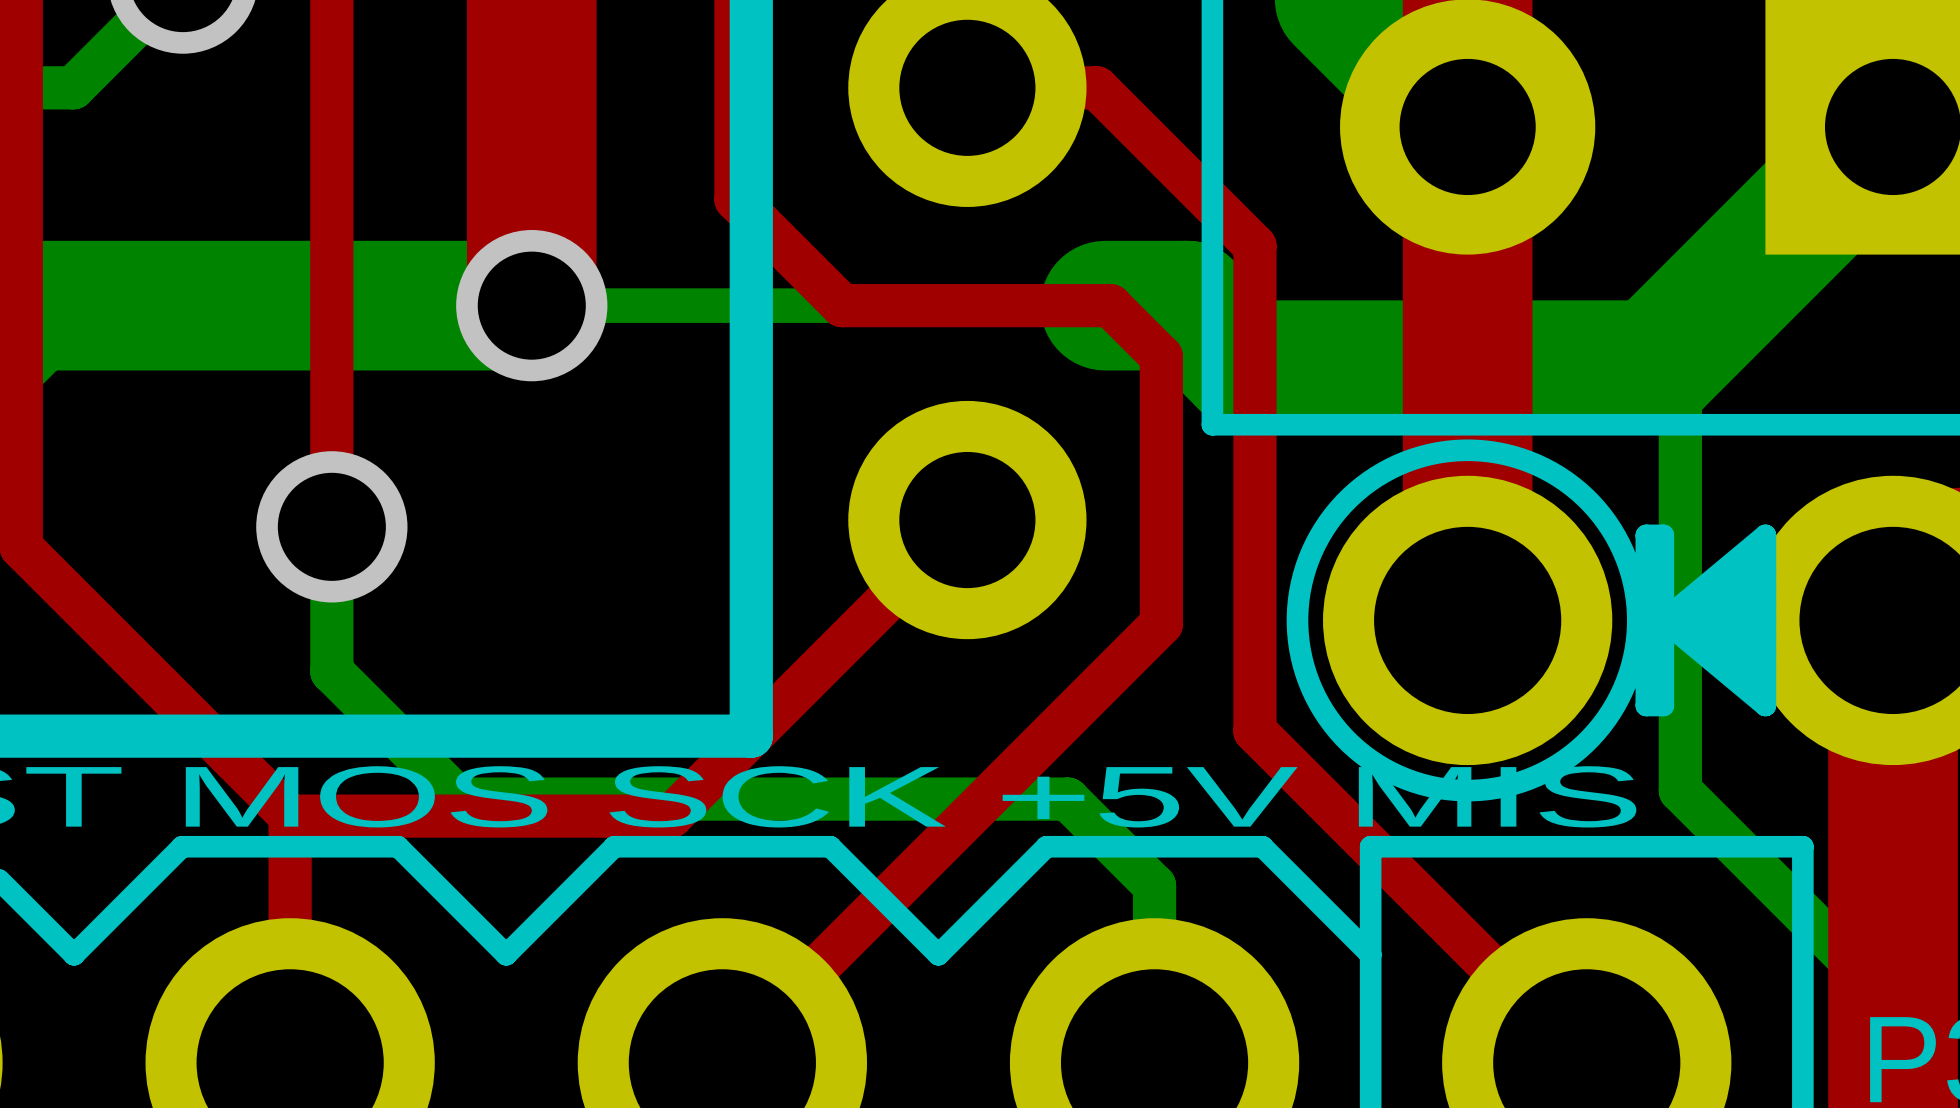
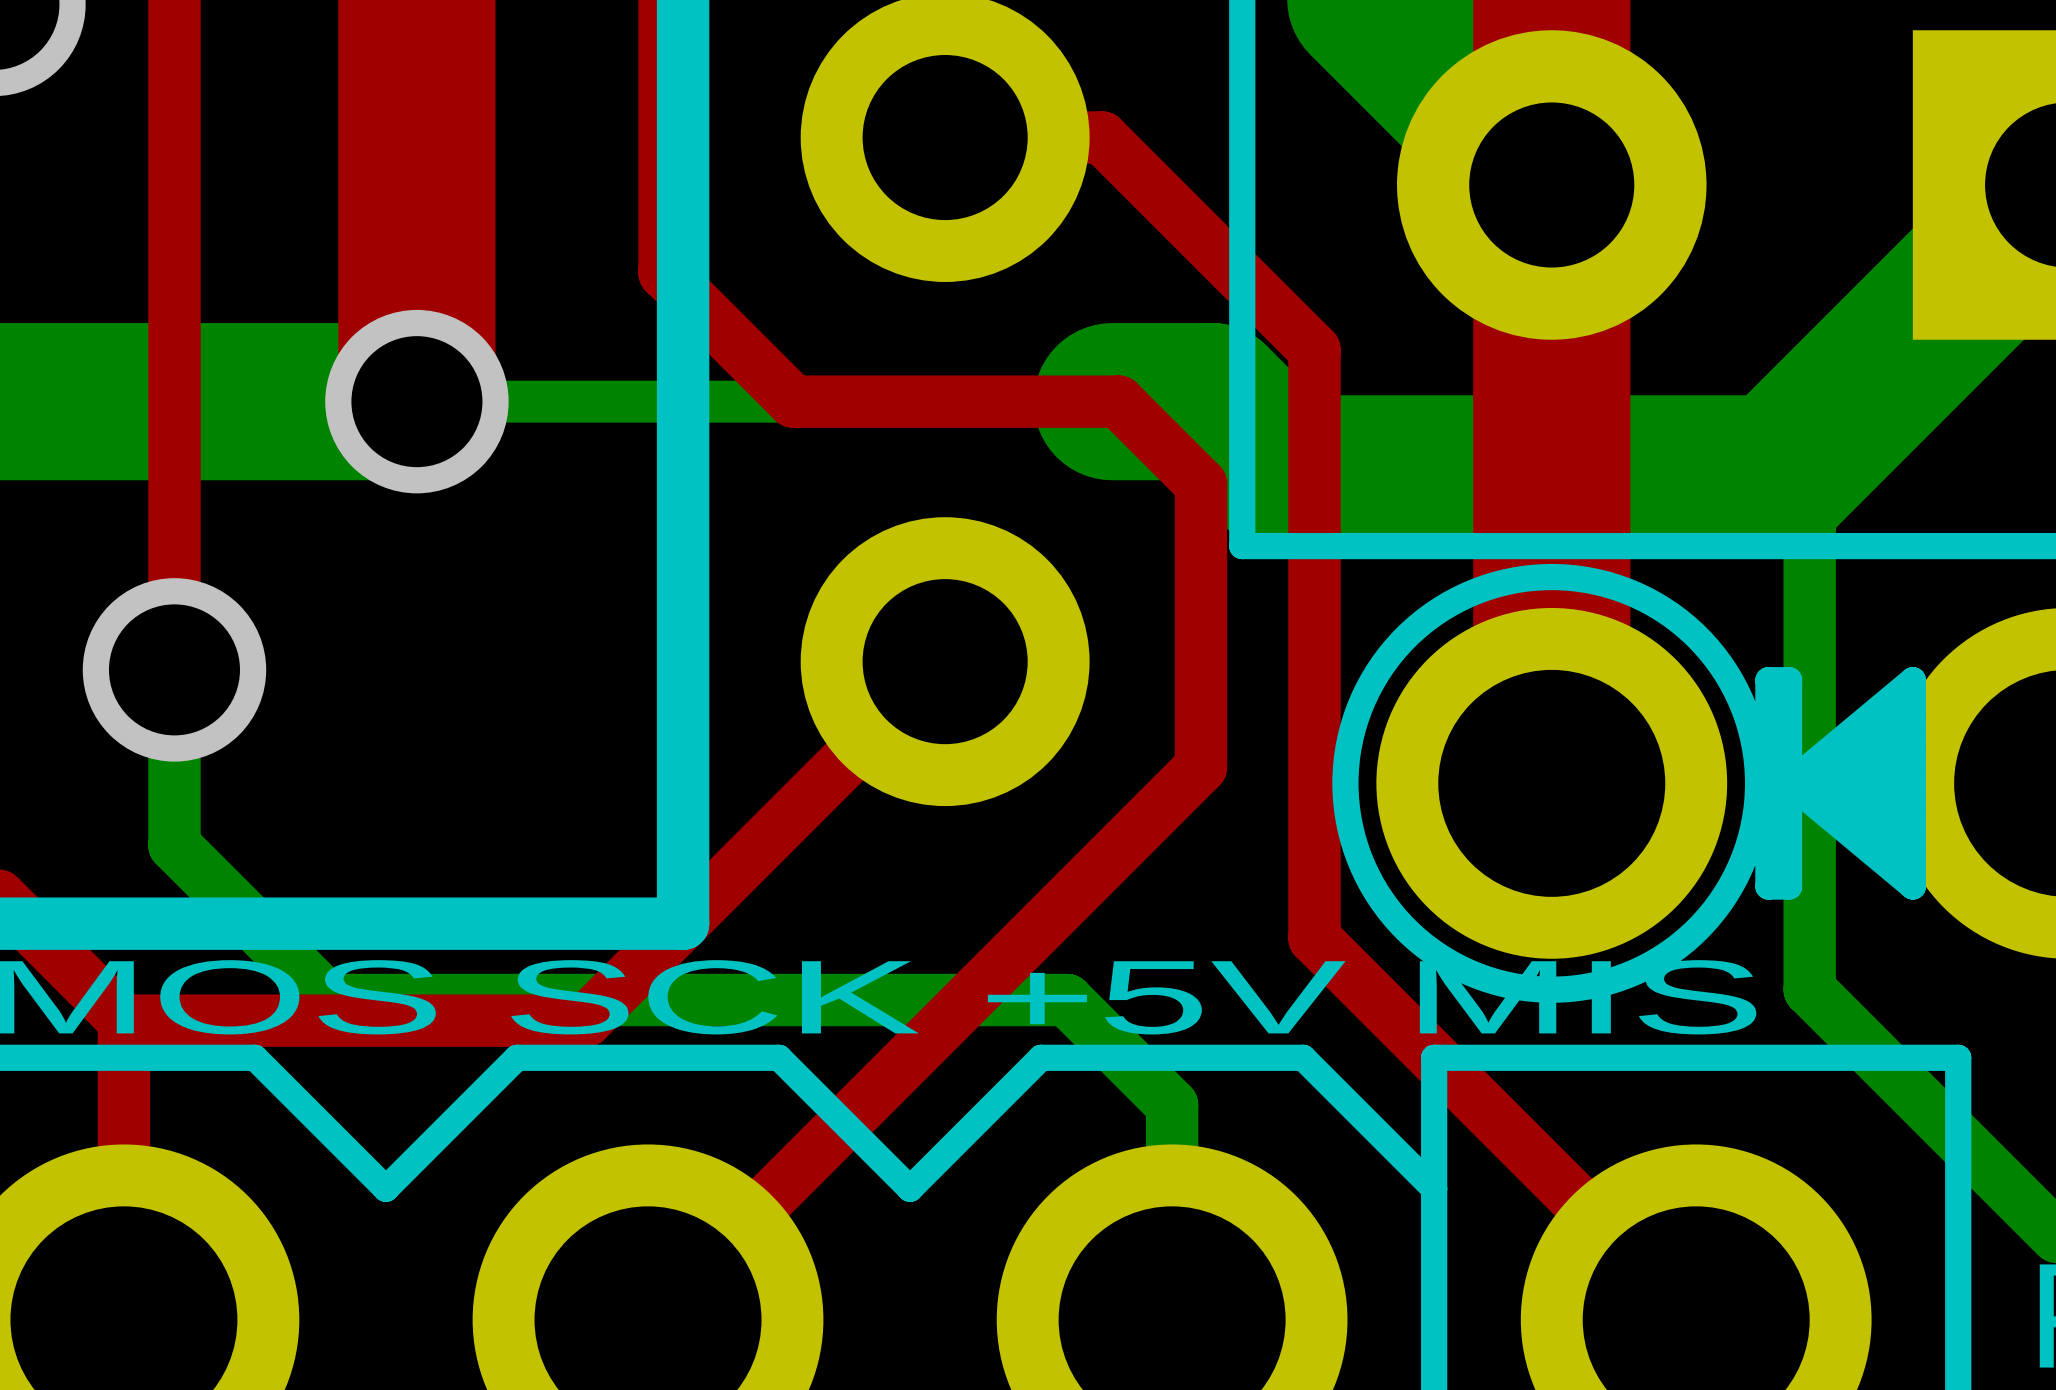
top track: (1254, 246) (1254, 731) (1271, 748) -> (1293, 329) (1314, 350) (1314, 938)
top track: (1161, 356) (1161, 623) -> (1180, 463) (1200, 484) (1200, 766) (1180, 787)

